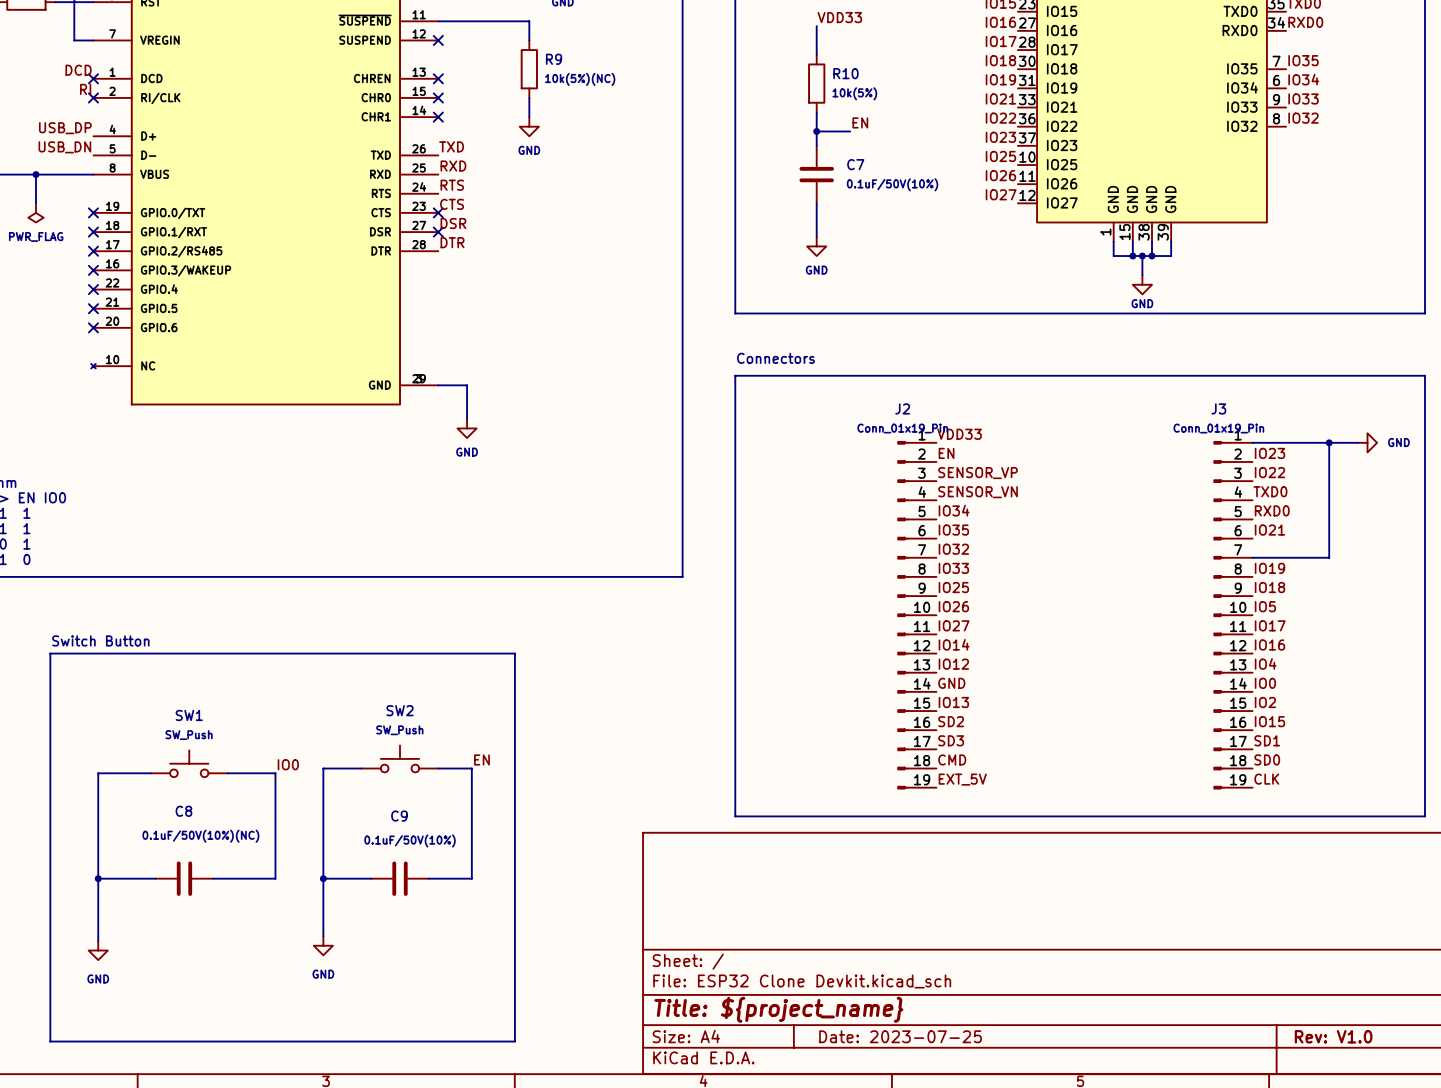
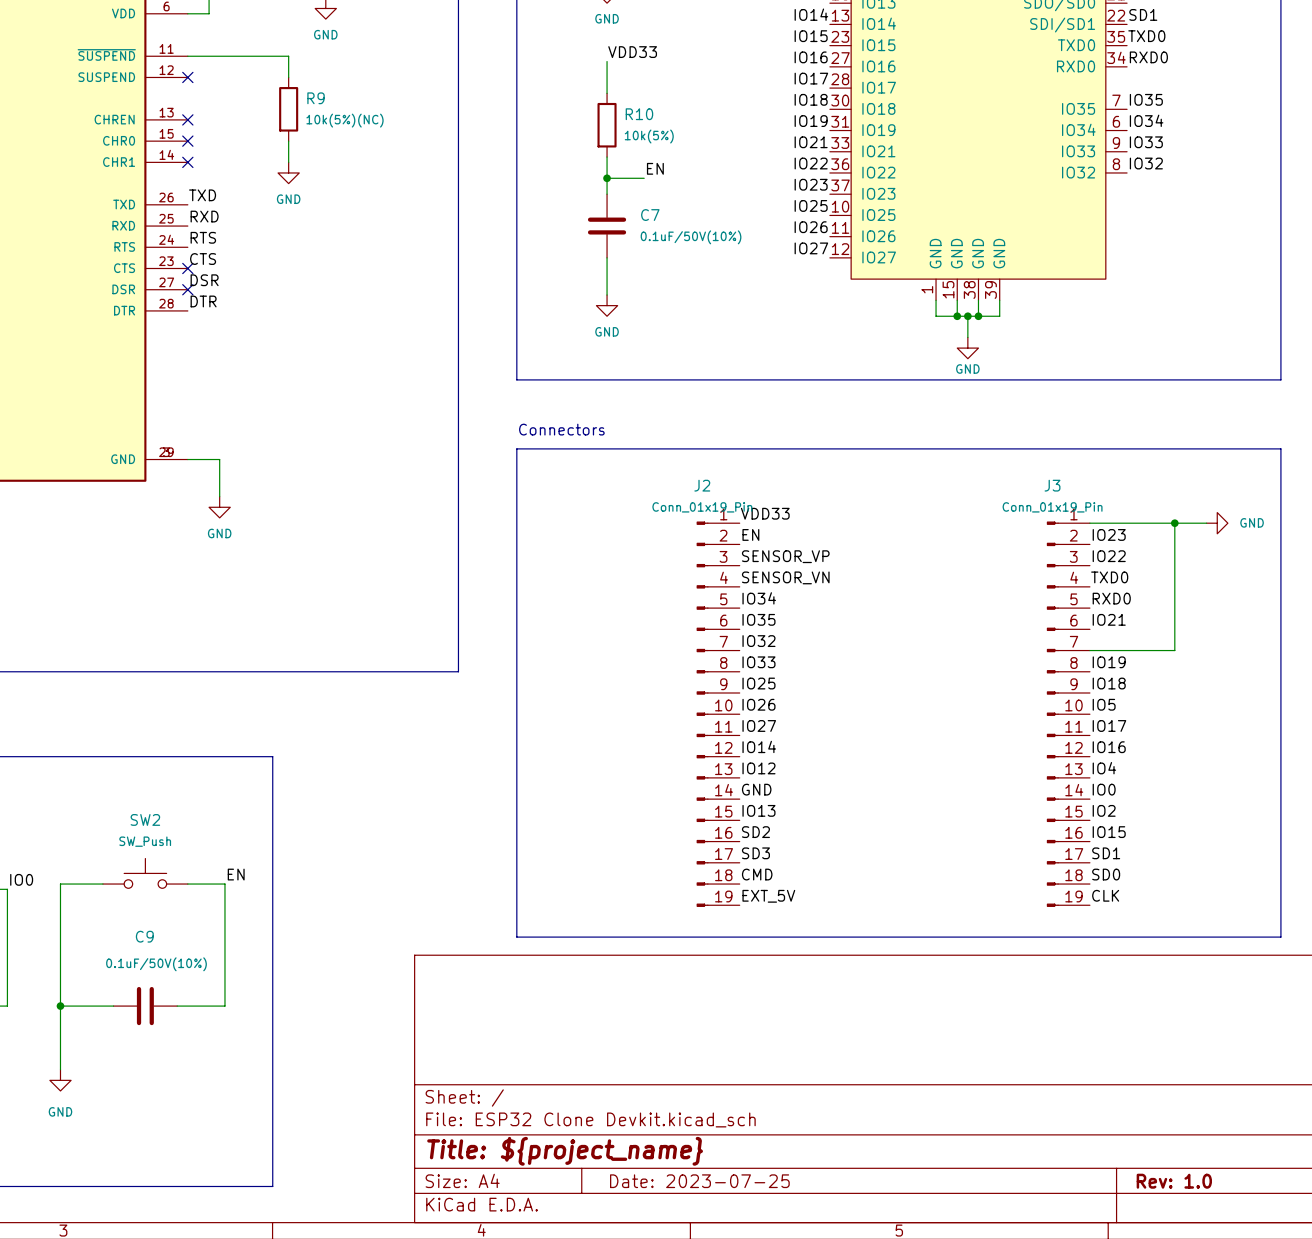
title block: Rev: V1.0 (1333, 1036) -> Rev: 1.0 (1174, 1181)

